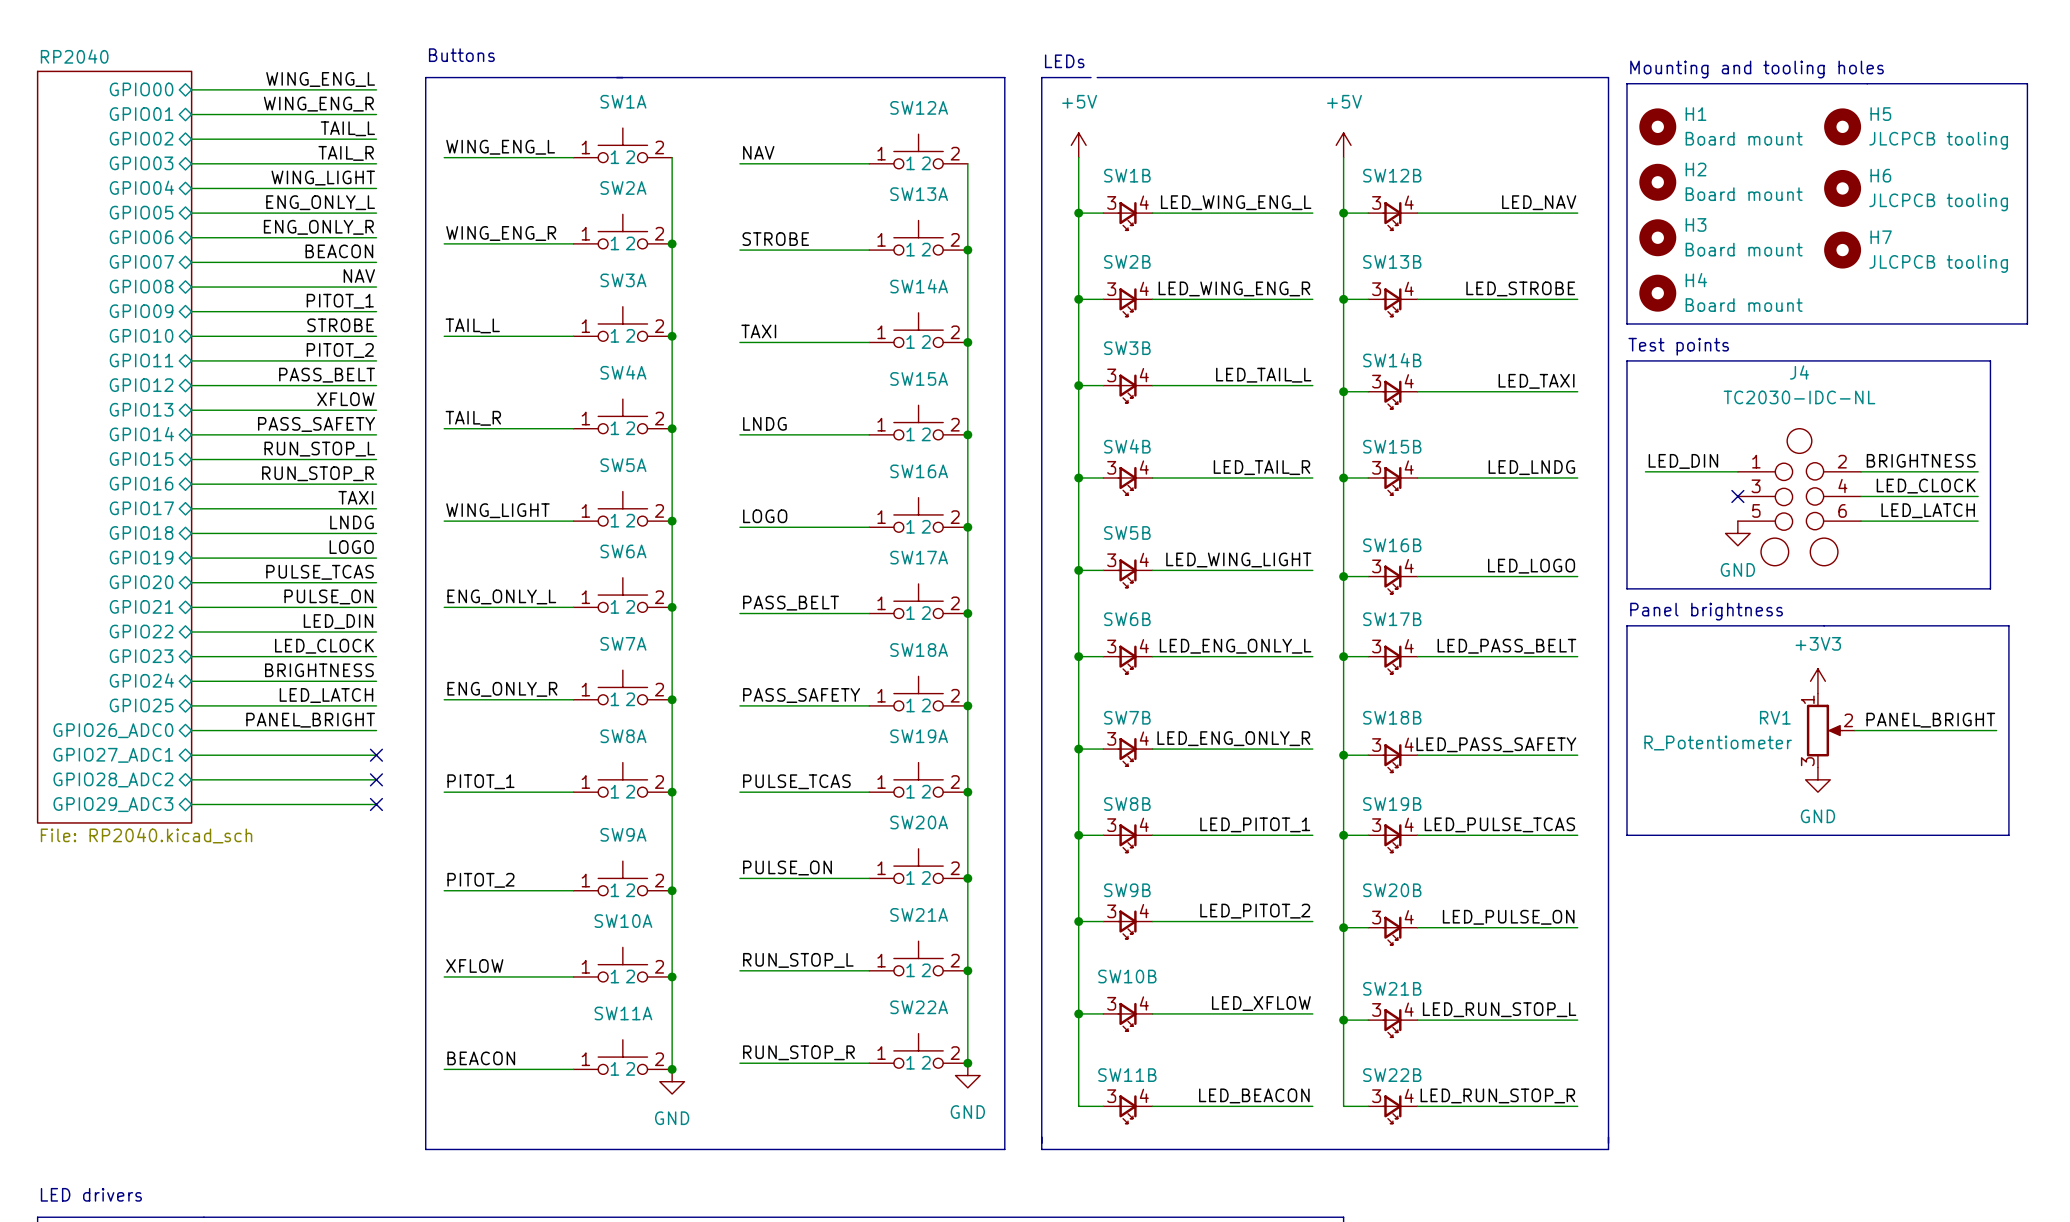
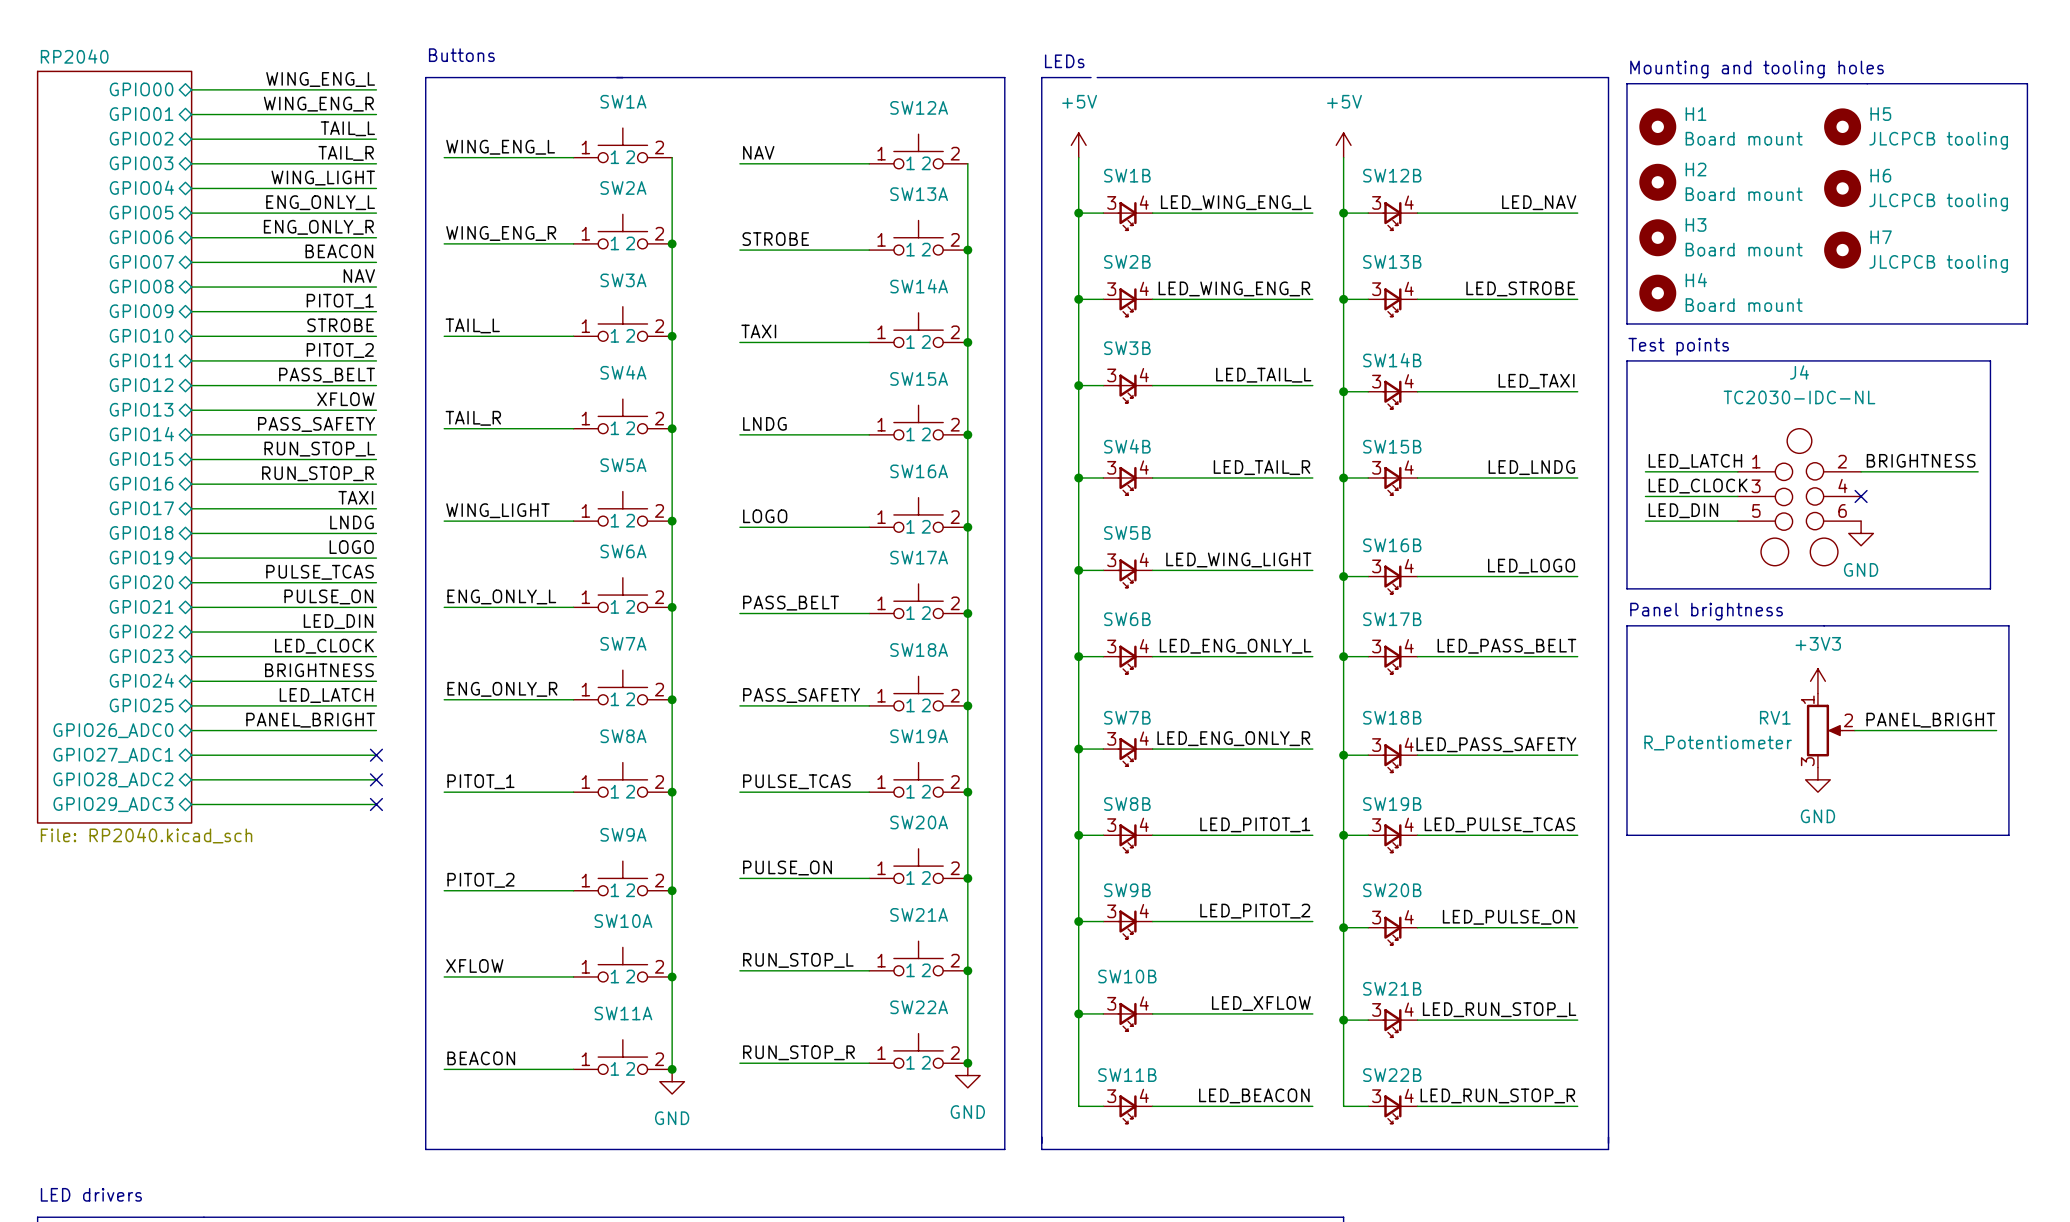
label: LED_DIN (1683, 461) -> LED_LATCH (1695, 461)
label: none -> LED_CLOCK (1698, 486)
label: LED_CLOCK (1926, 486) -> none
wire: none -> (1645, 496) (1737, 496)
no-connect mark: (1737, 496) -> none
wire: (1861, 496) (1978, 496) -> none
no-connect mark: none -> (1861, 496)
label: none -> LED_DIN (1683, 510)
label: LED_LATCH (1928, 510) -> none
wire: none -> (1645, 521) (1737, 521)
wire: (1861, 521) (1978, 521) -> none
power symbol position: GND (1737, 533) -> GND (1861, 533)

